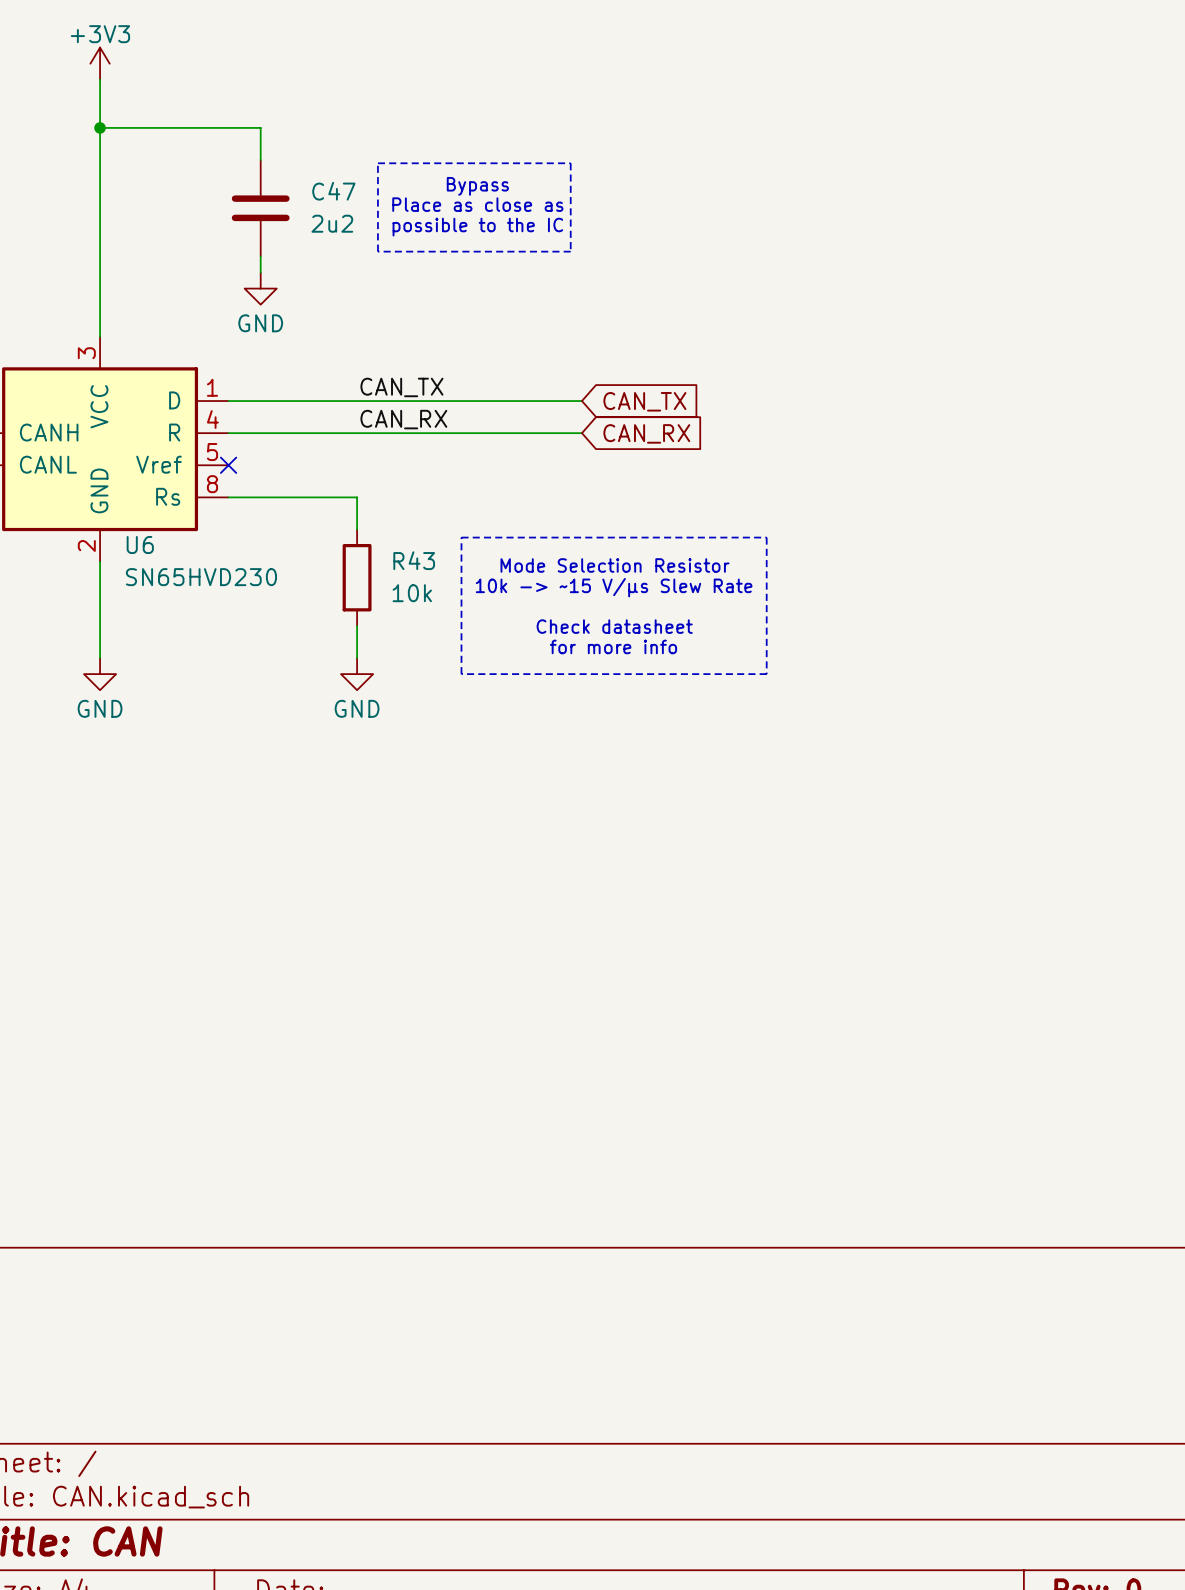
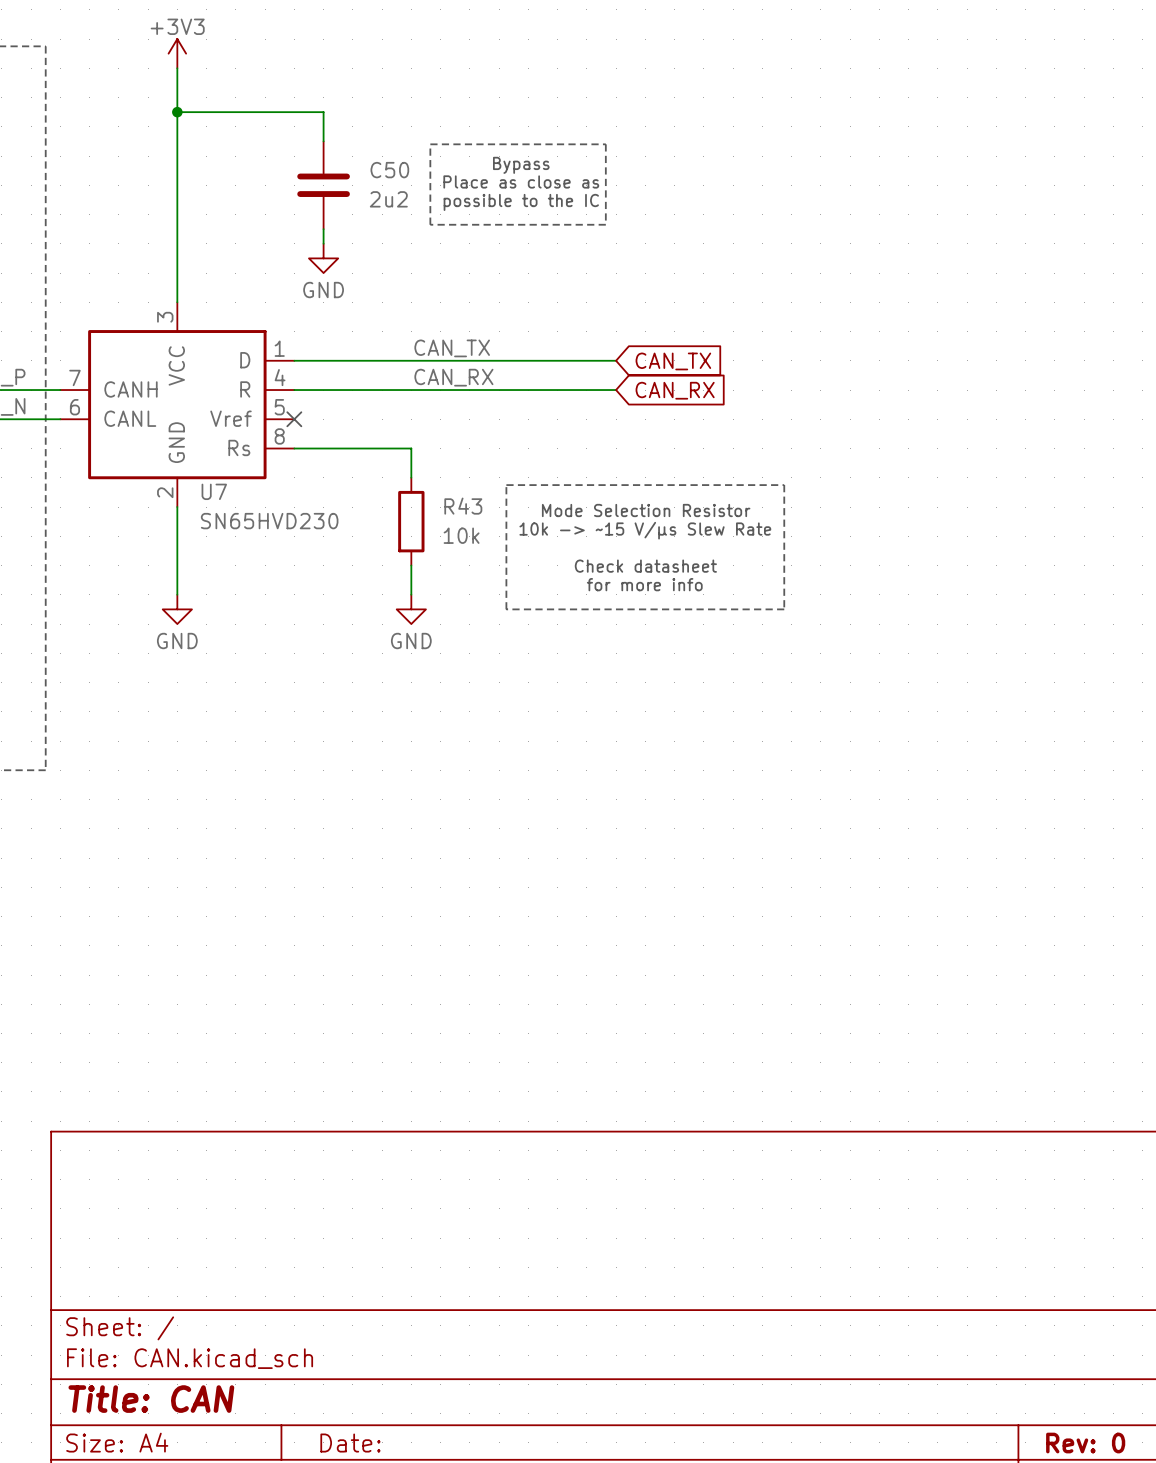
C47 name: C47 (333, 191) -> C50 (389, 170)
U6 name: U6 (140, 544) -> U7 (214, 491)

